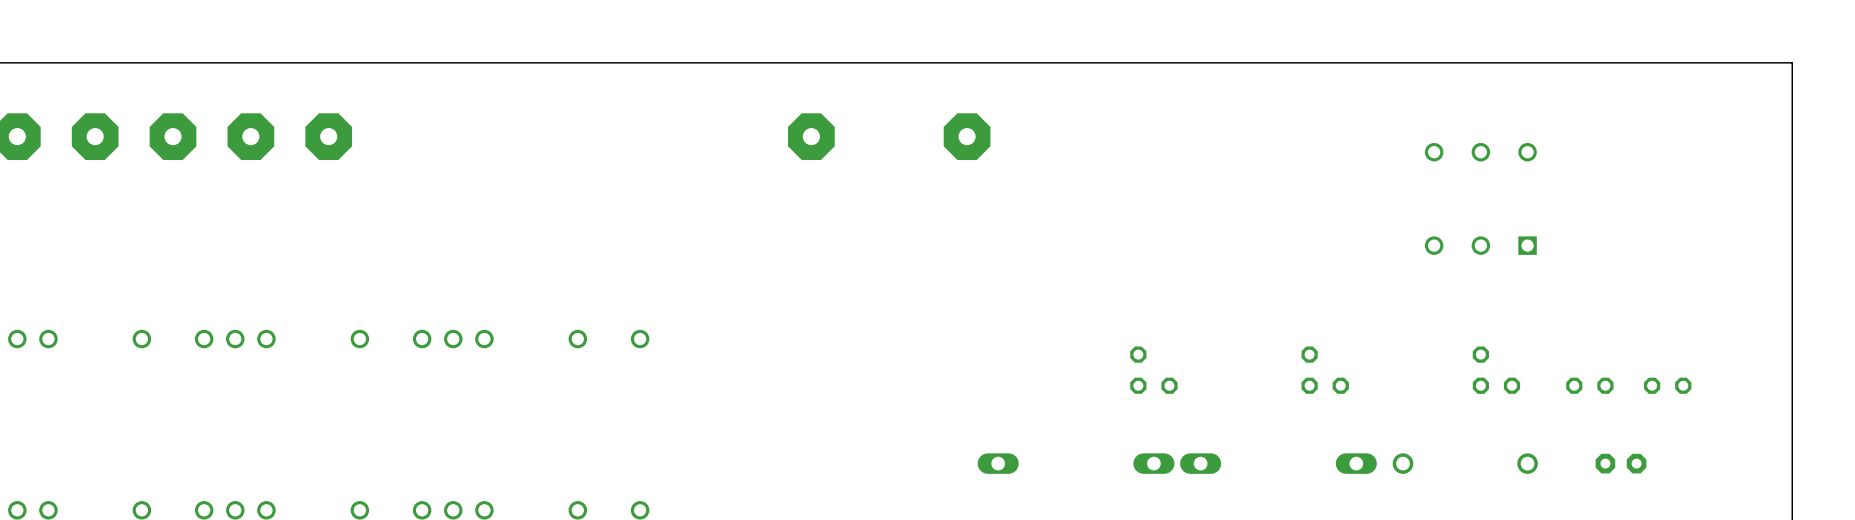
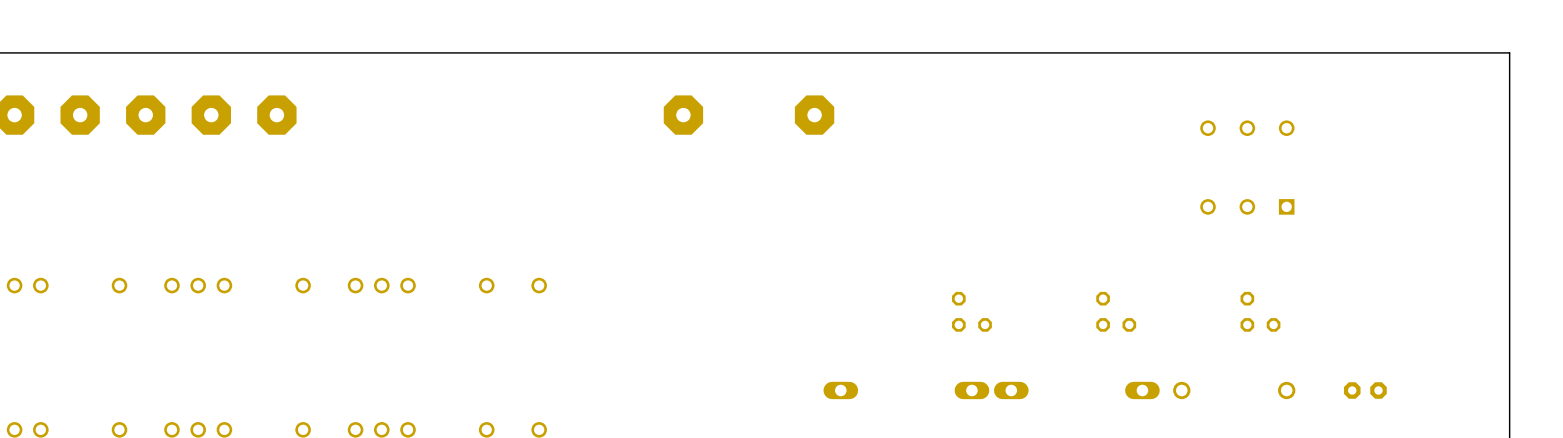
part: (1589, 385) -> none
part: (1667, 385) -> none

